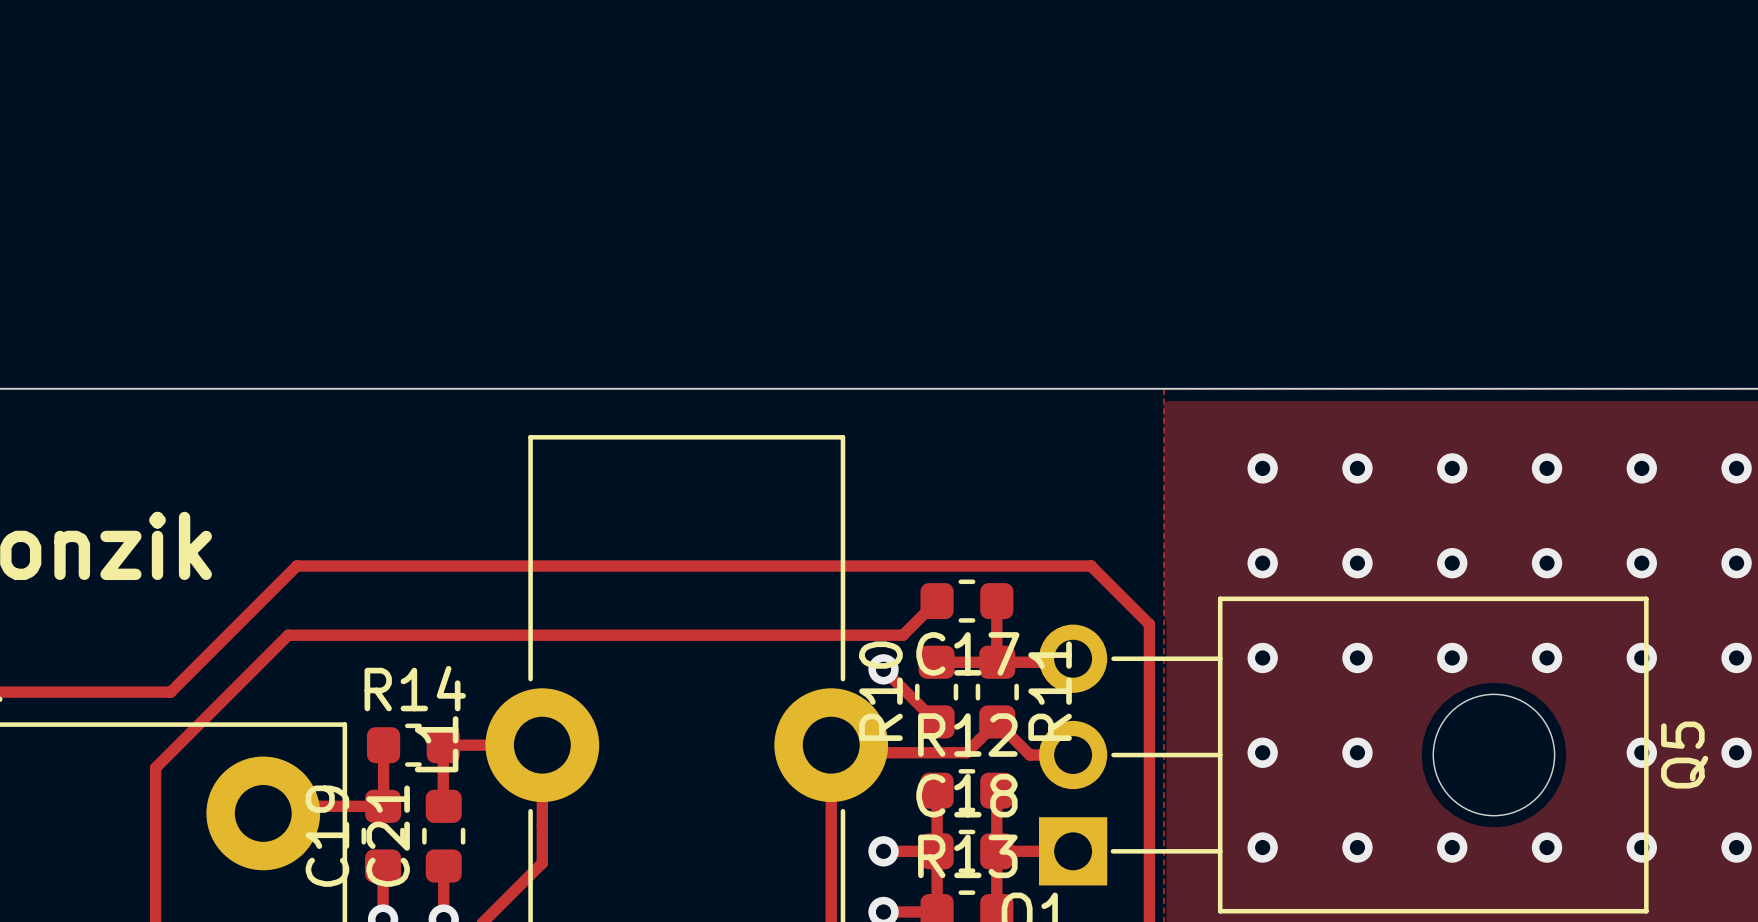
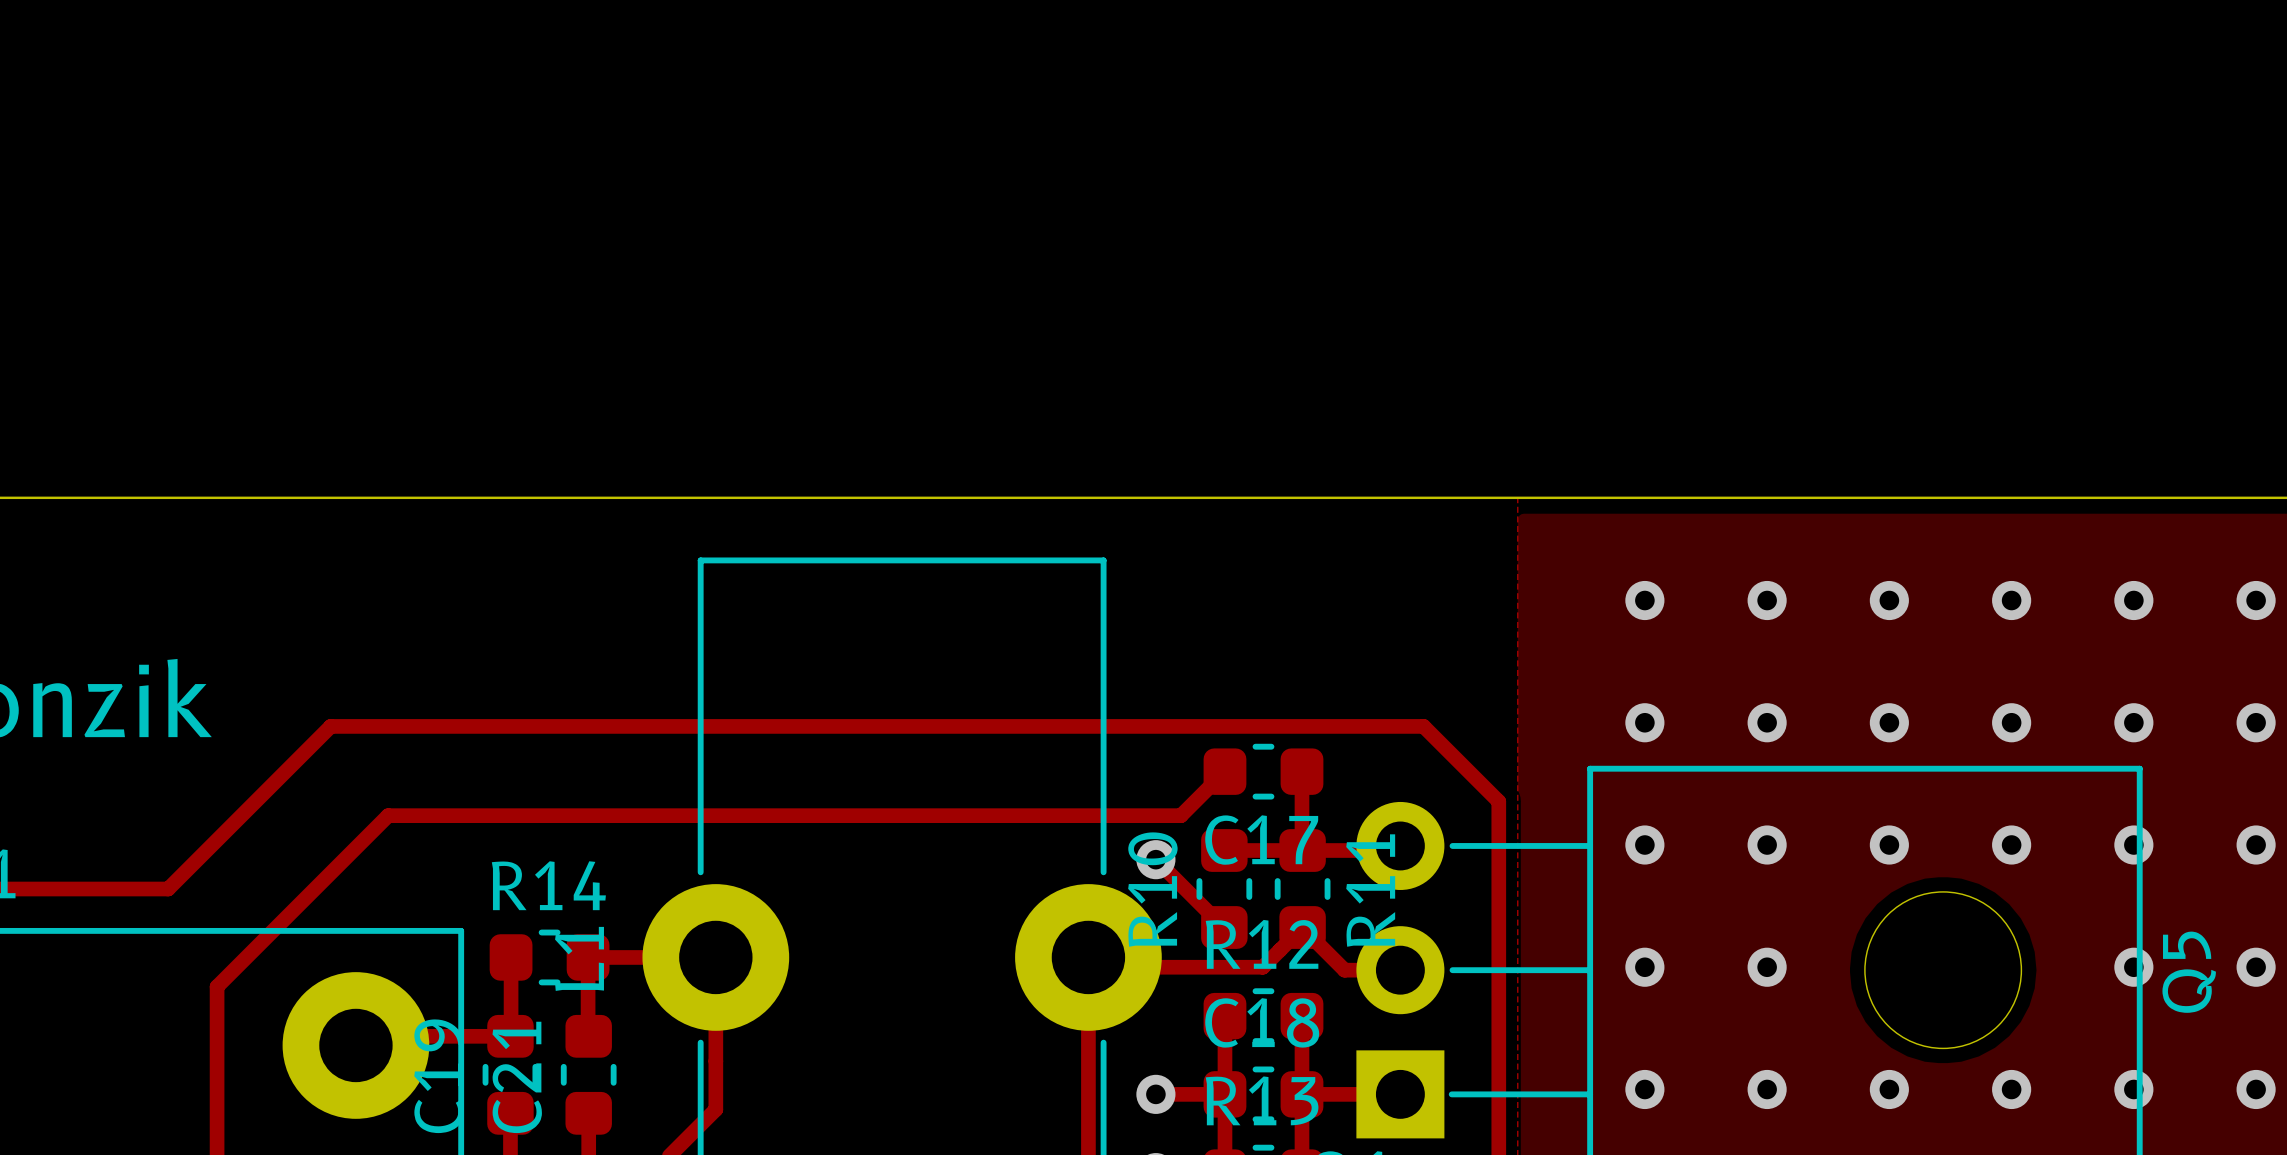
track: (296, 566) (170, 692) (117, 692) -> (399, 726) (330, 726) (168, 889)

